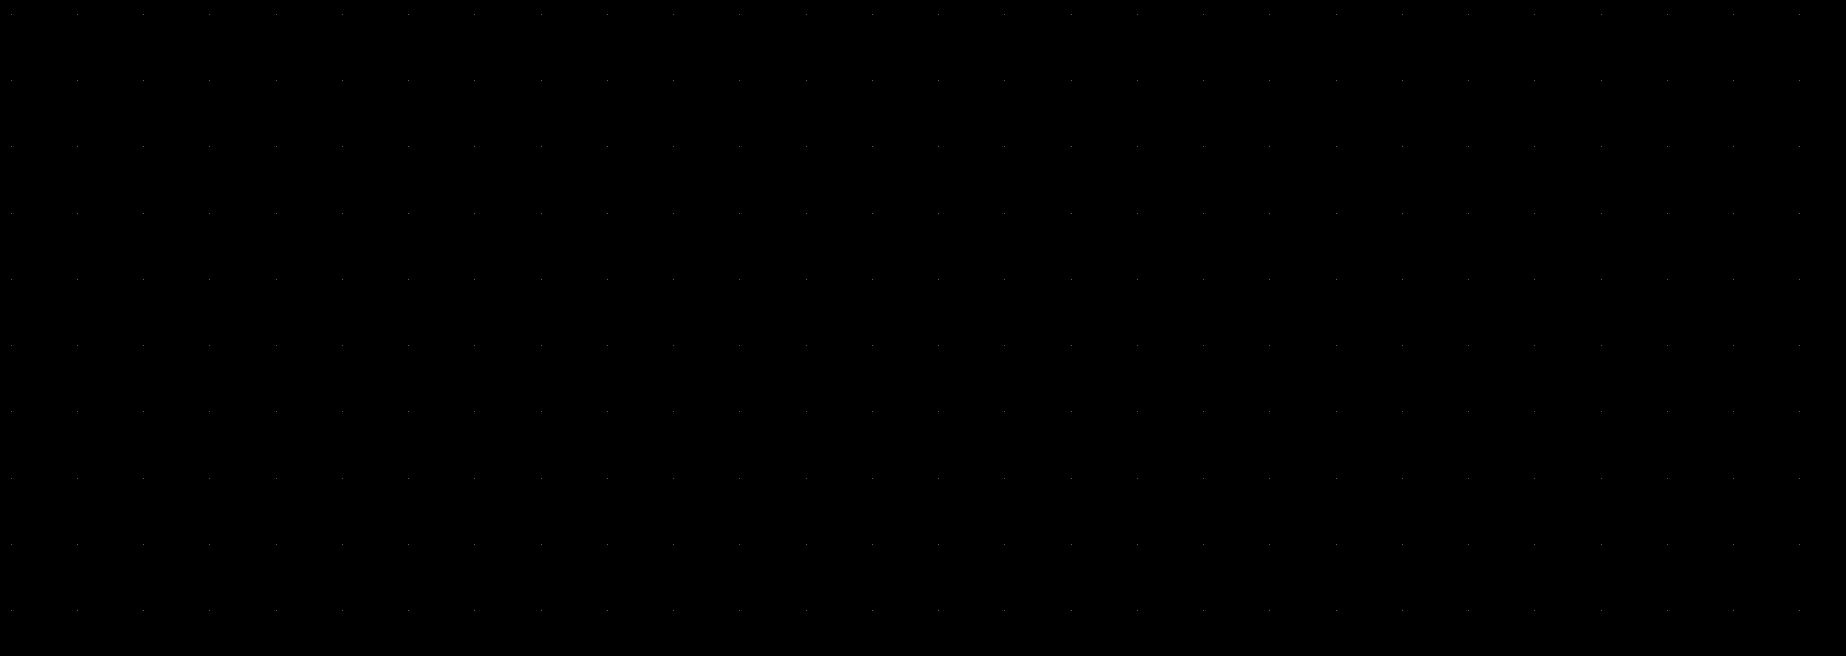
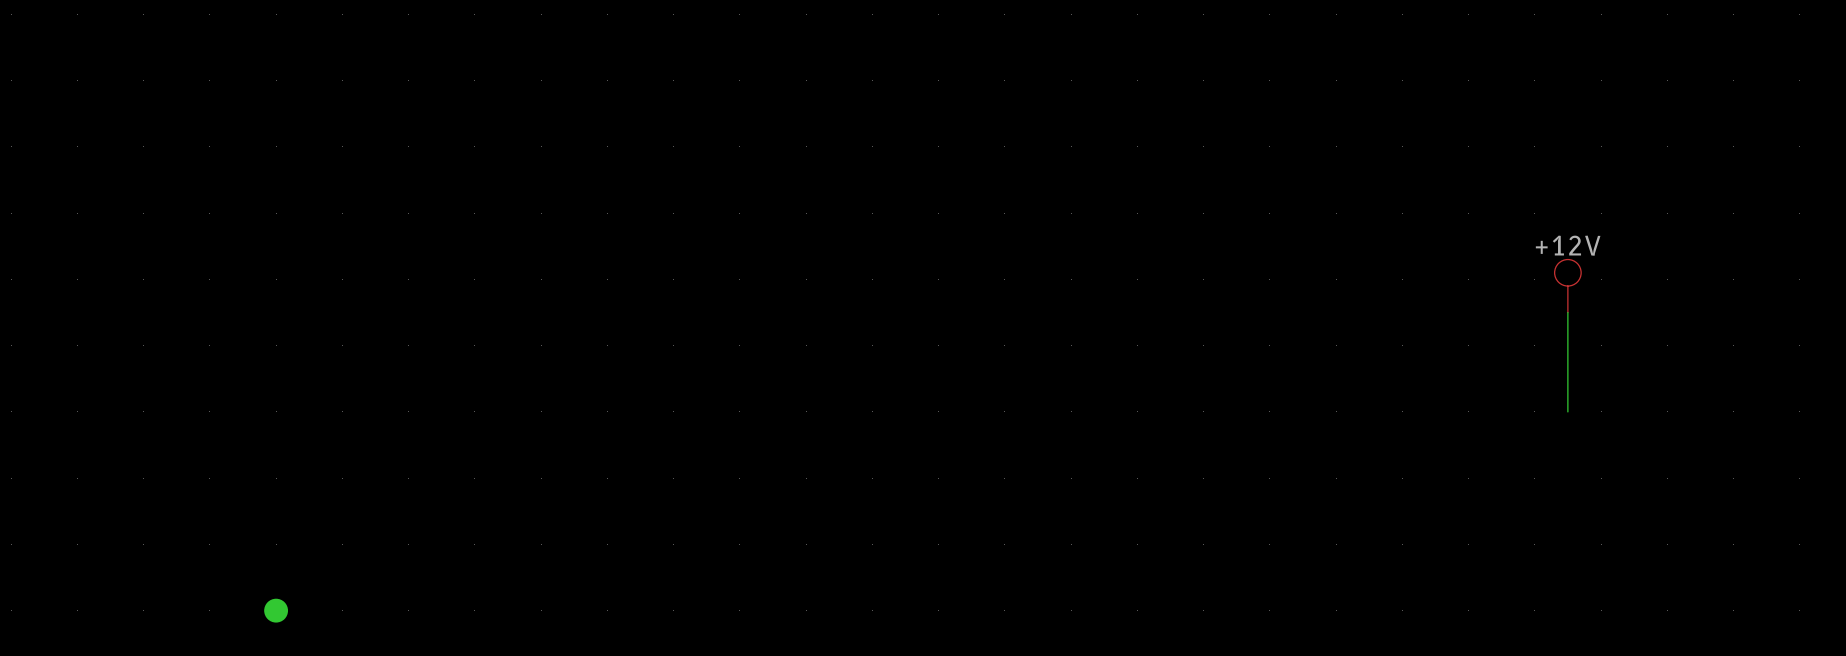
power symbol: none -> +12V (1567, 286)
wire: none -> (1567, 312) (1567, 411)
junction: none -> (276, 610)

